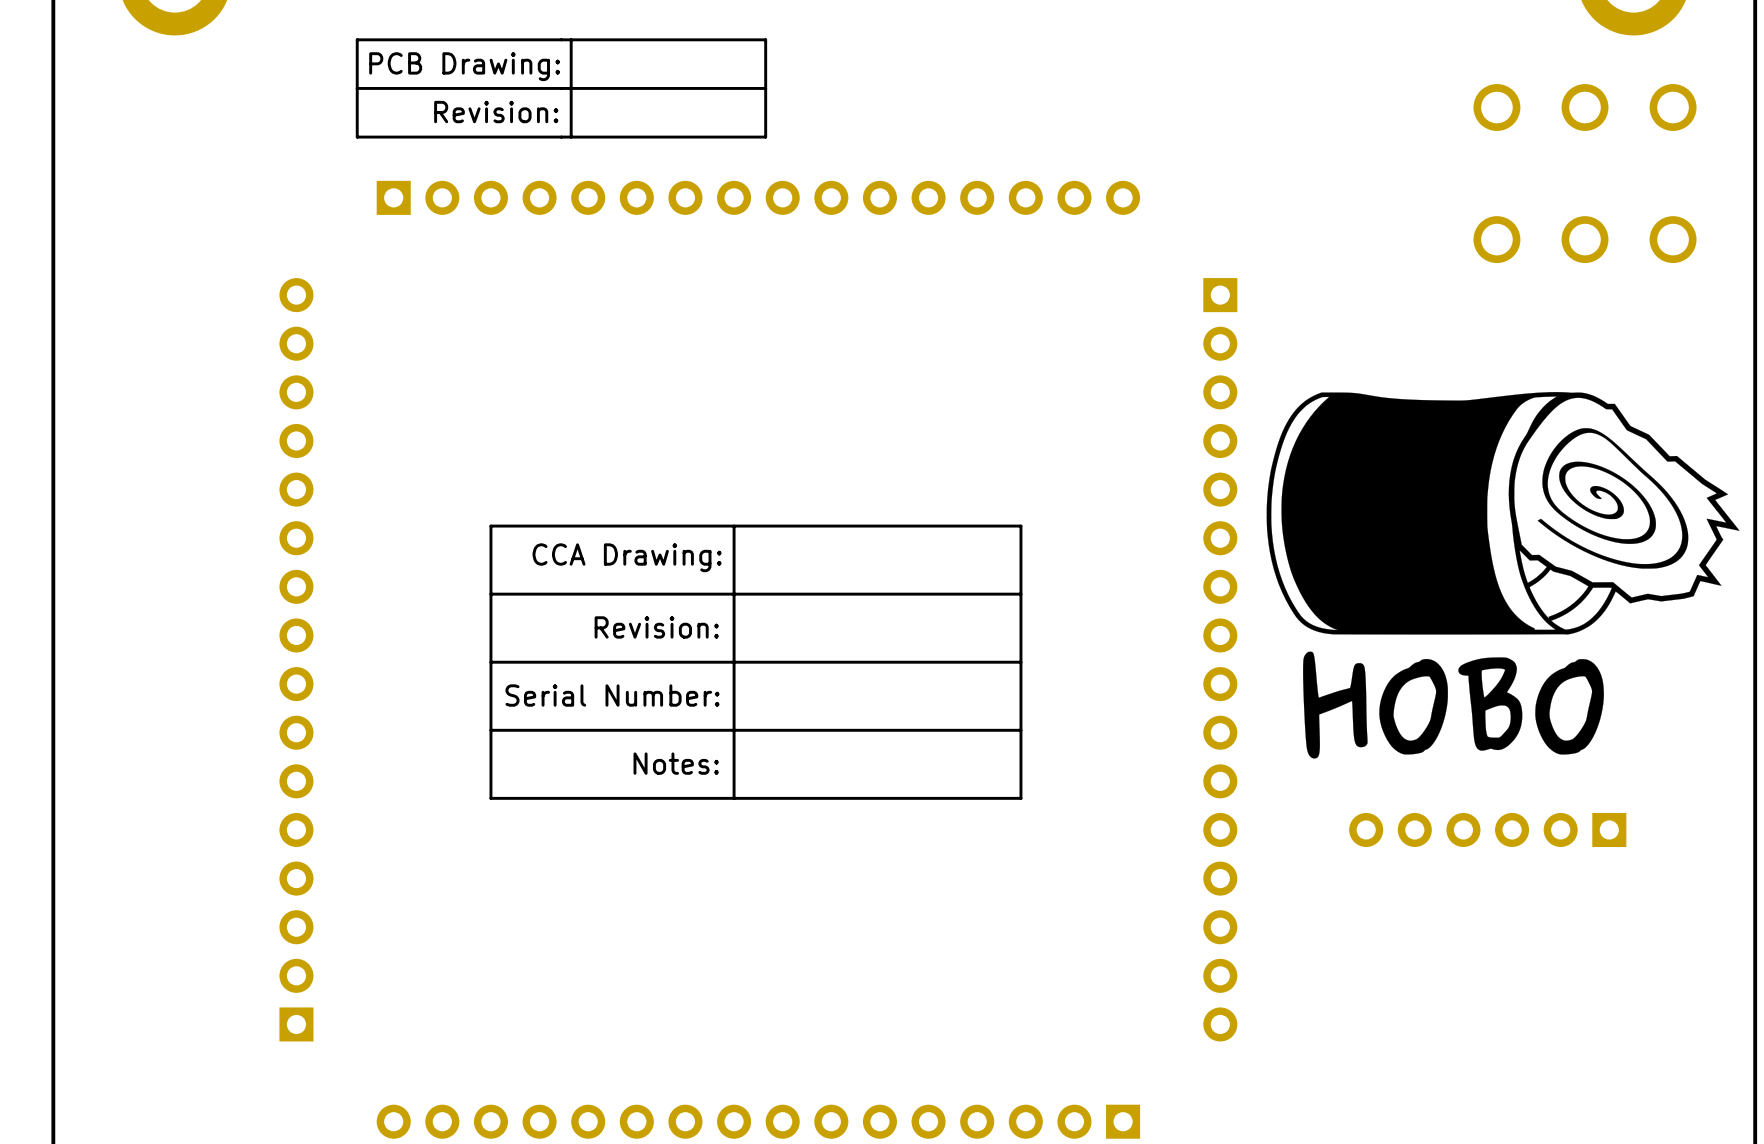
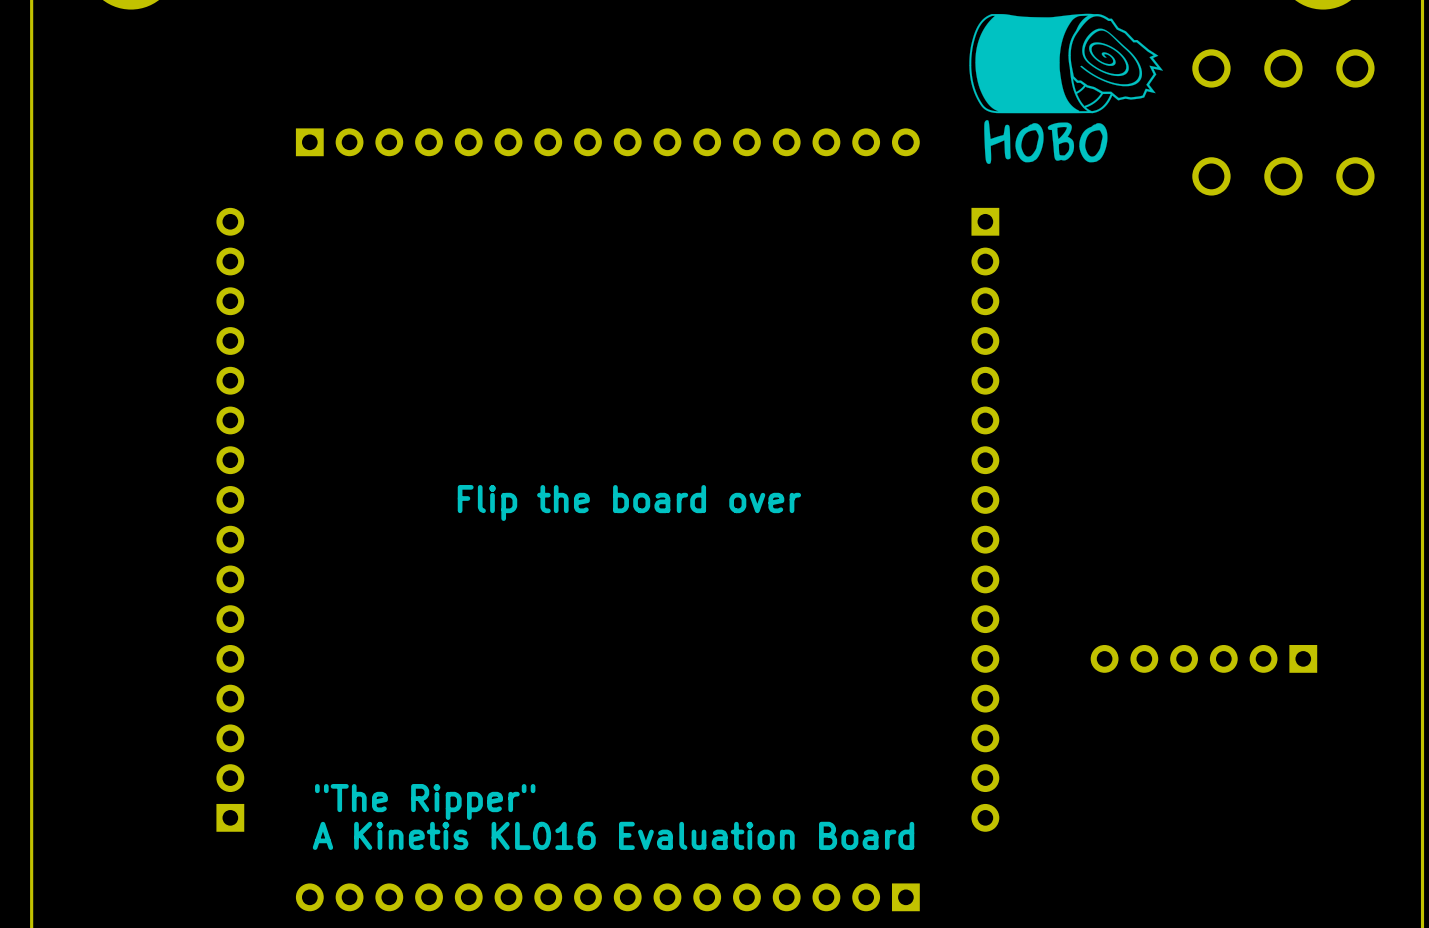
drawing: [355, 38, 768, 139] -> none
drawing: none -> [969, 13, 1164, 164]
drawing: [1266, 392, 1740, 759] -> none
drawing: [489, 524, 1023, 800] -> none
text: none -> Flip the board over (629, 502)
text: none -> "The Ripper" (425, 802)
text: none -> A Kinetis KL016 Evaluation Board (613, 835)

